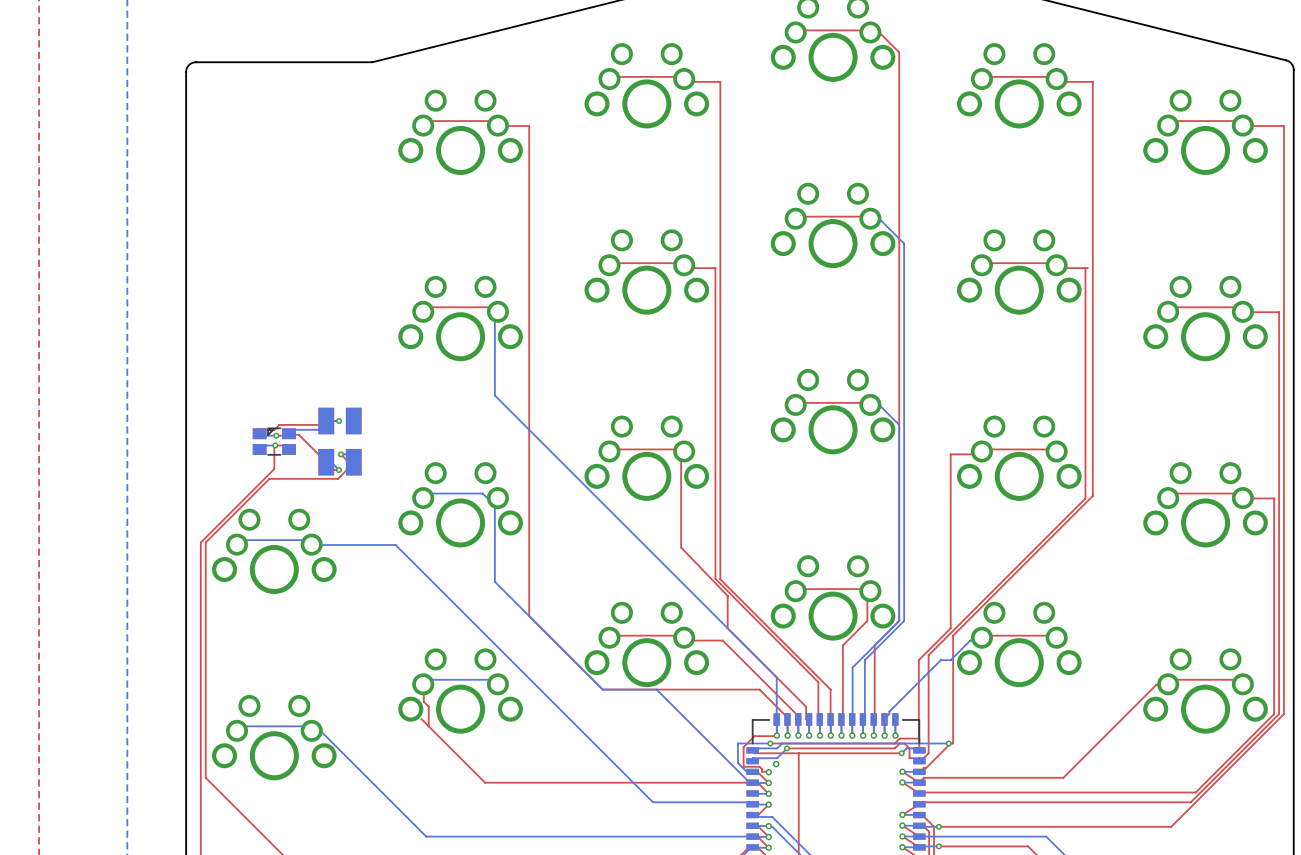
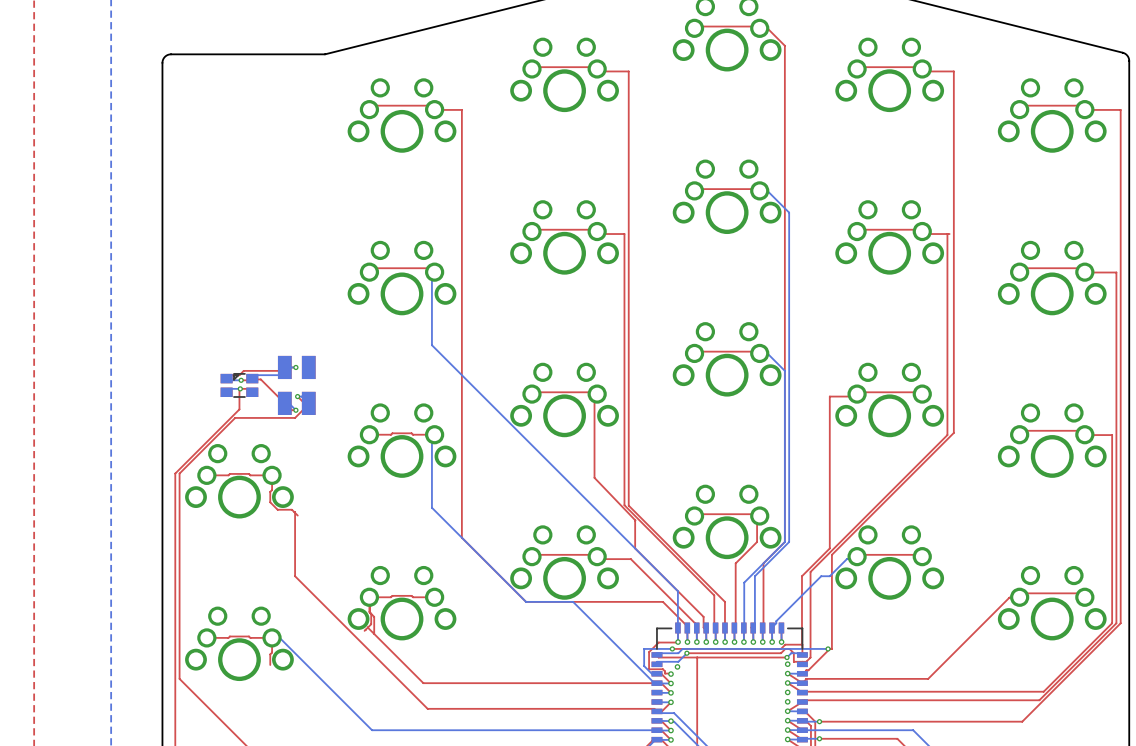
bottom track: (497, 498) (494, 500) (489, 500) (482, 493) (427, 493) (423, 498) -> none
top track: none -> (434, 434) (369, 434)
bottom track: (237, 544) (241, 540) (307, 540) (312, 545) (395, 545) (652, 802) (750, 802) (752, 804) -> none
top track: none -> (206, 475) (272, 475) (270, 502) (277, 509) (291, 509) (297, 515)
top track: none -> (294, 512) (295, 576) (427, 708) (654, 708) (656, 711)
bottom track: (497, 684) (493, 679) (427, 679) (423, 684) -> none
top track: none -> (434, 597) (369, 597) (371, 624) (364, 630)
top track: none -> (206, 637) (272, 637) (270, 665)
bottom track: (311, 730) (307, 726) (241, 726) (237, 730) -> none
via: none -> (787, 664)
via: none -> (787, 692)
via: none -> (787, 701)

